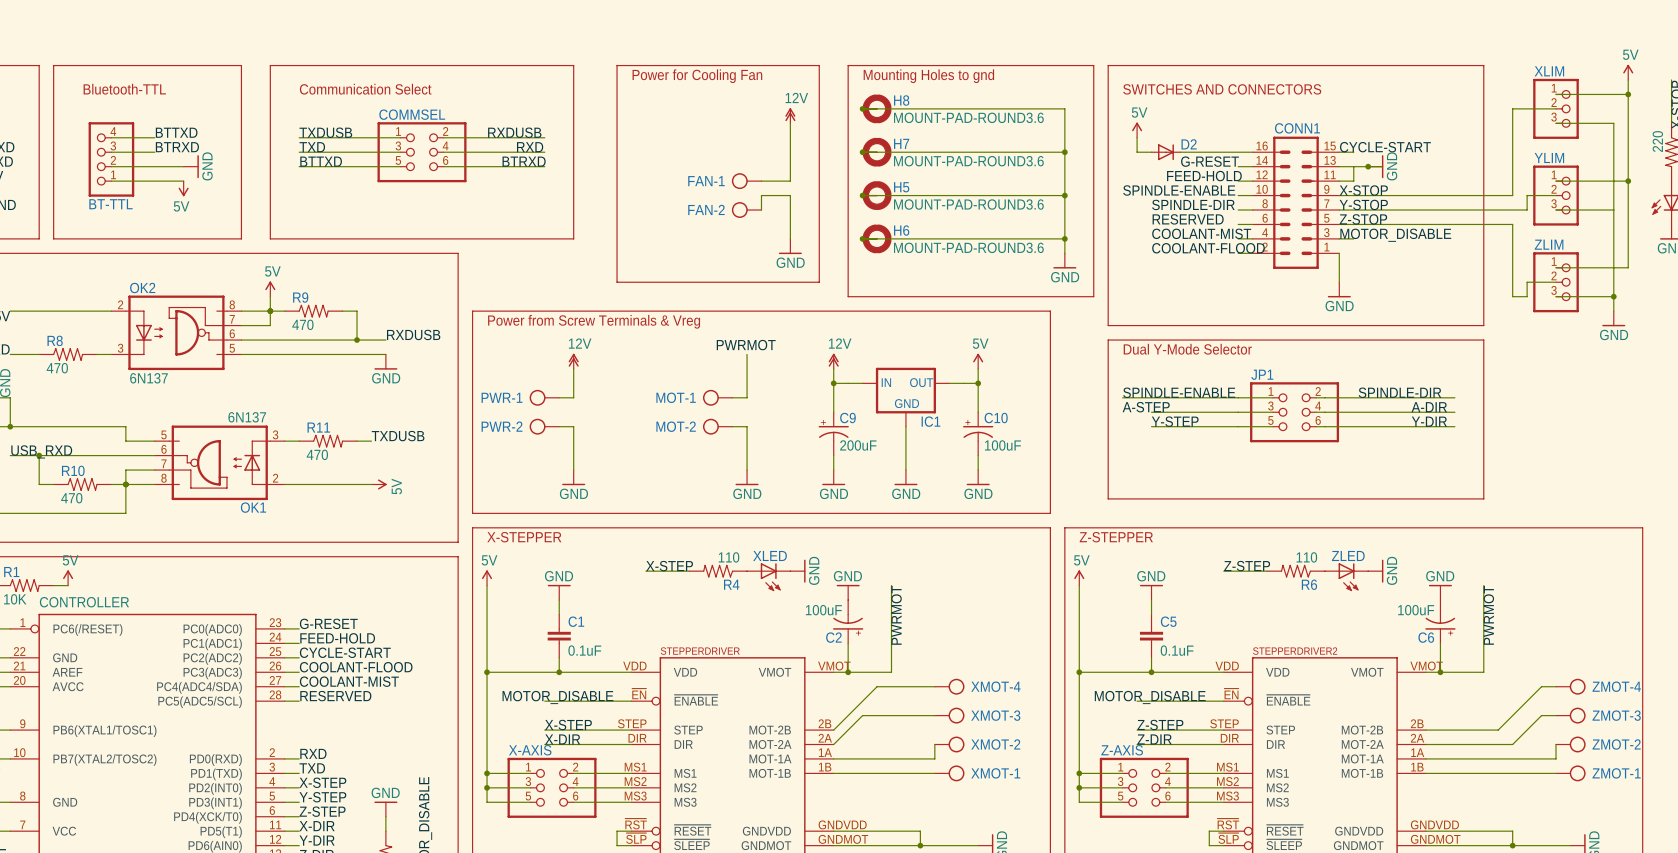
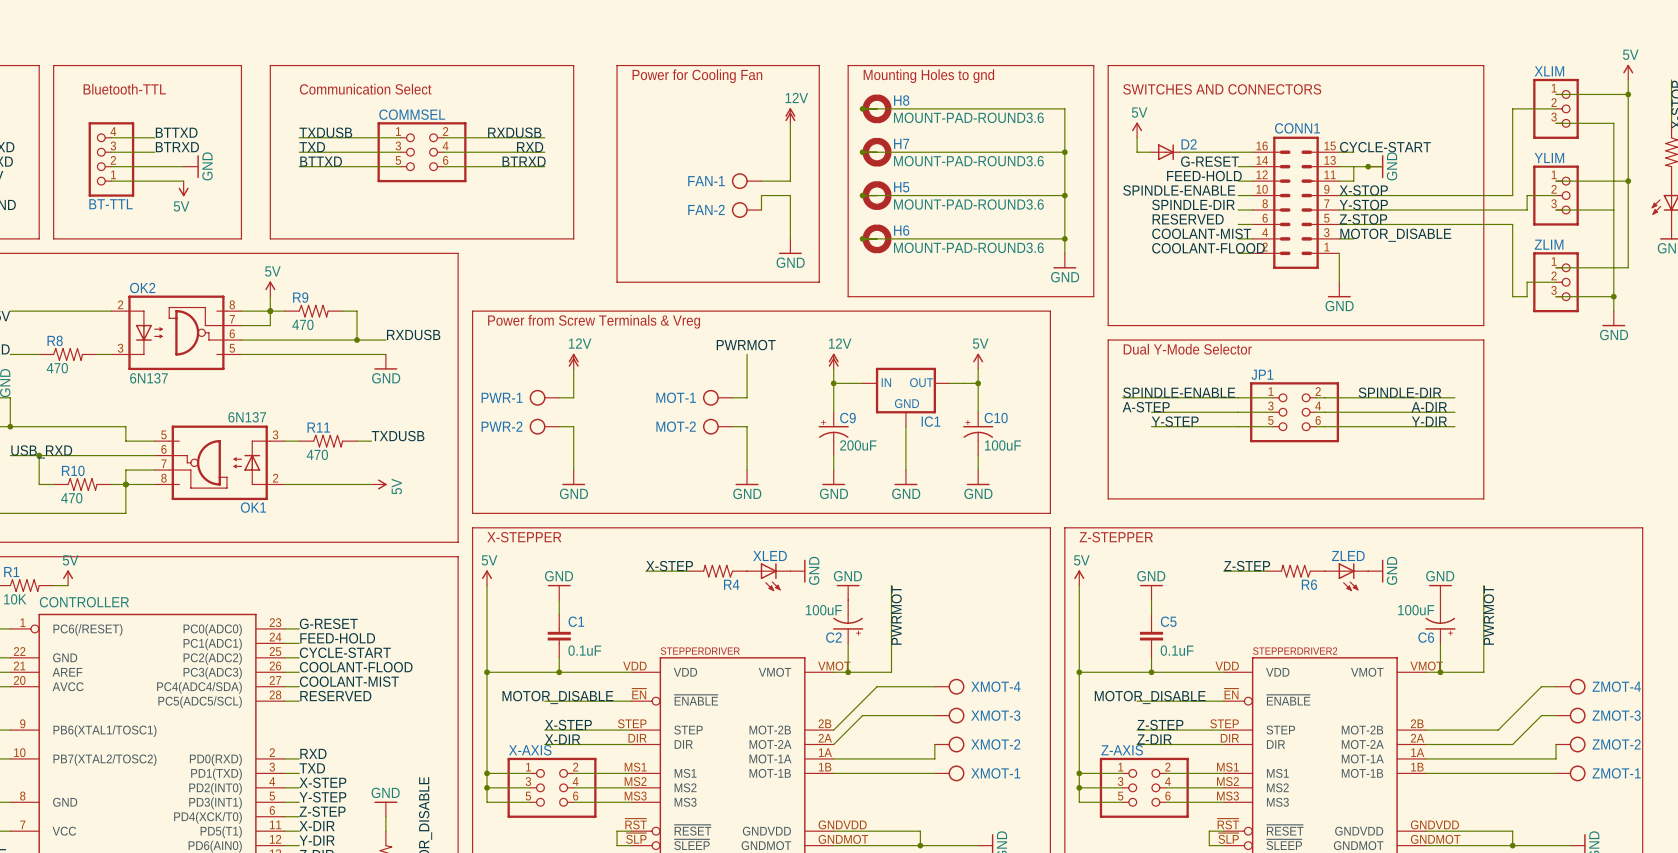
part value: 220 (1657, 141) -> none
R4 value: 110 (729, 557) -> none
R6 value: 110 (1306, 557) -> none

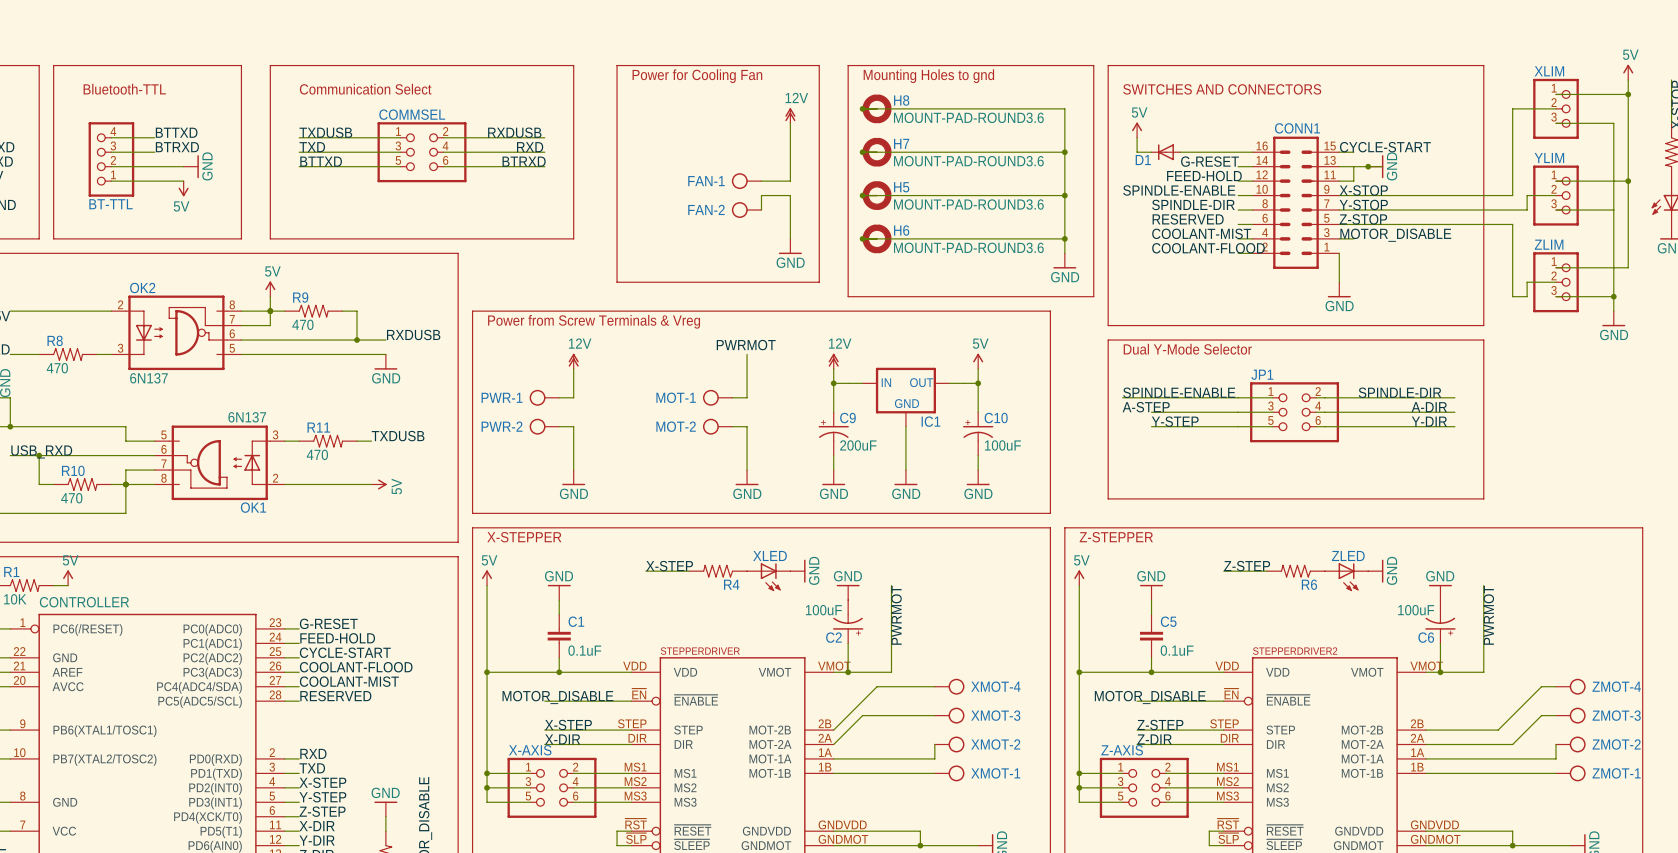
D2: (1165, 152) -> none
D1: none -> (1165, 152)

